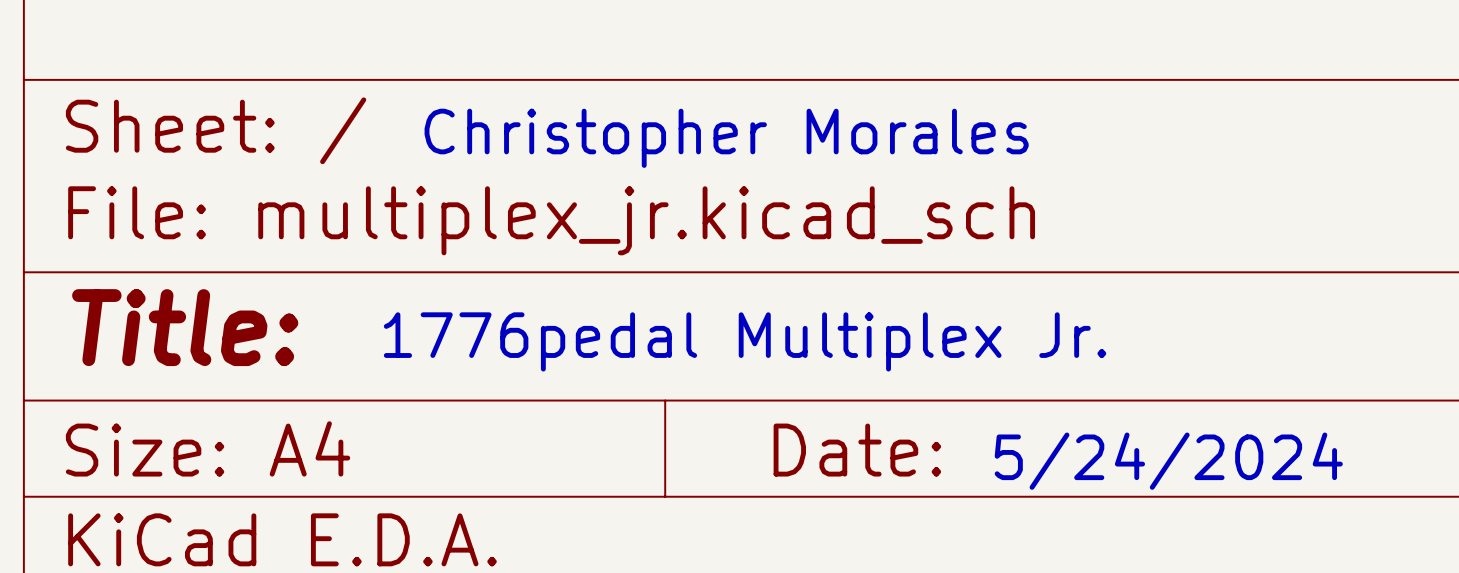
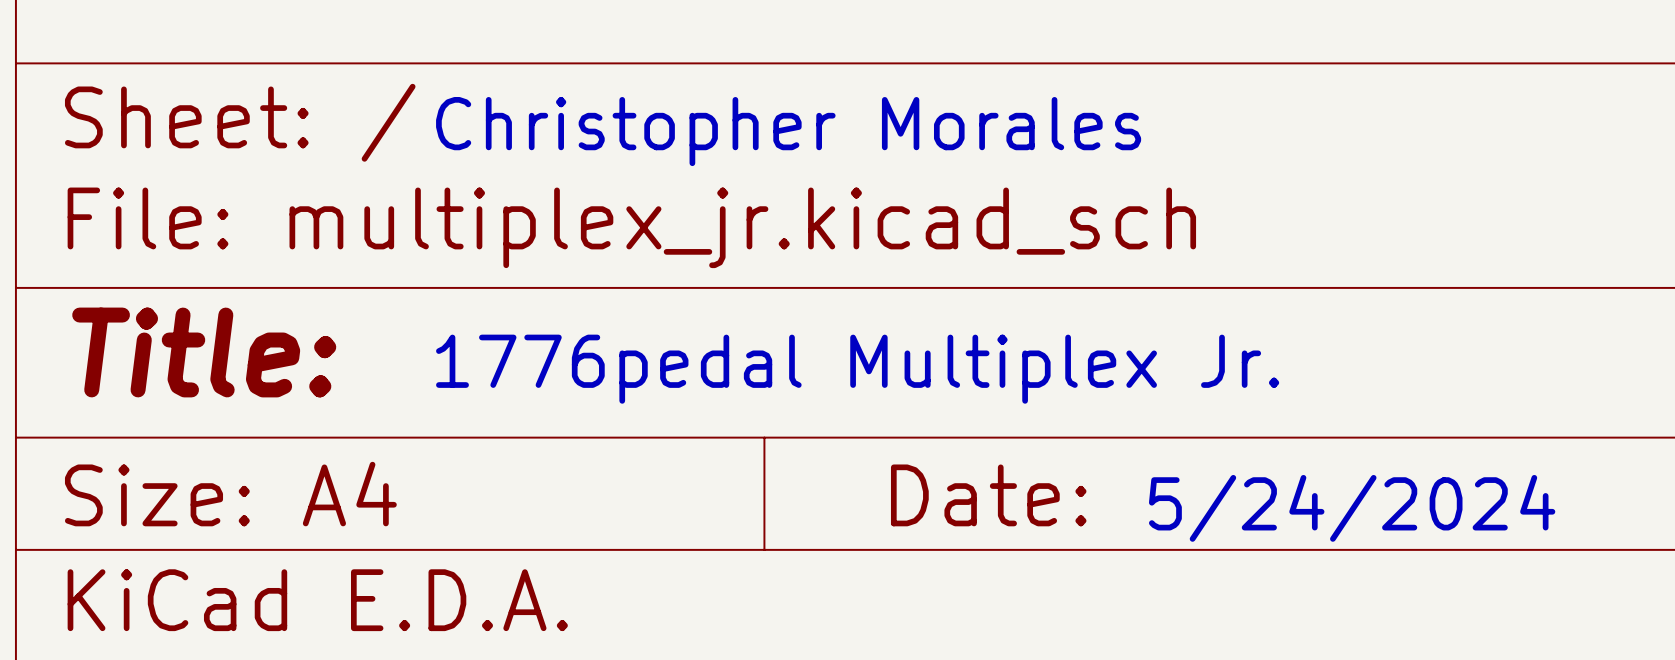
text position: Christopher Morales (726, 138) -> Christopher Morales (788, 131)

